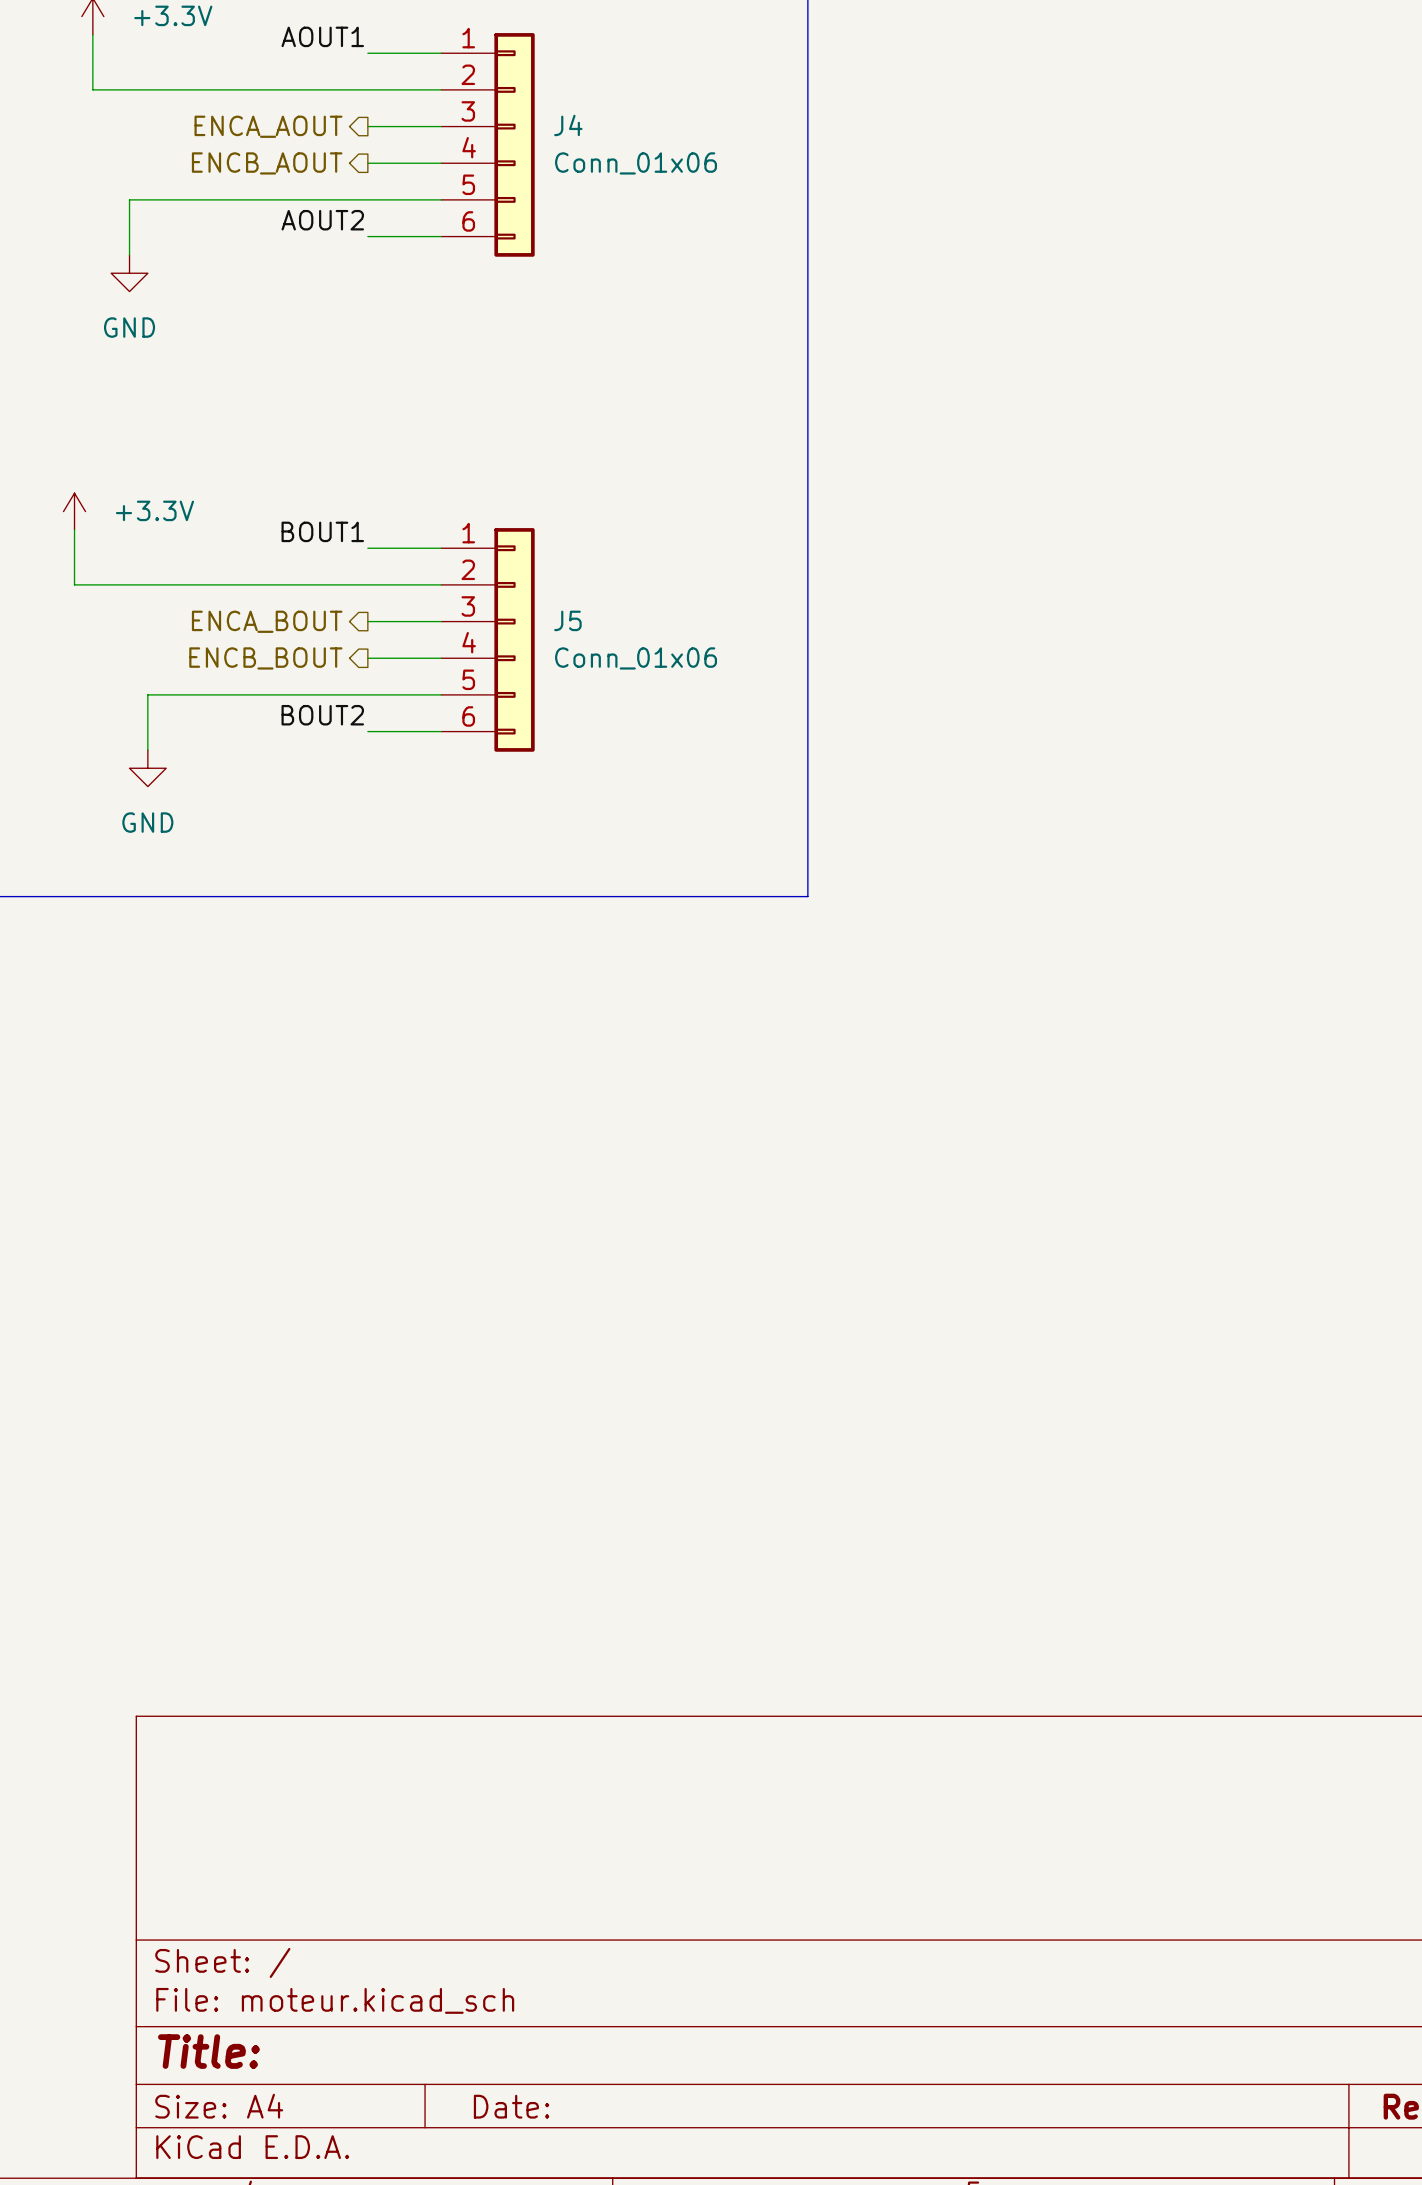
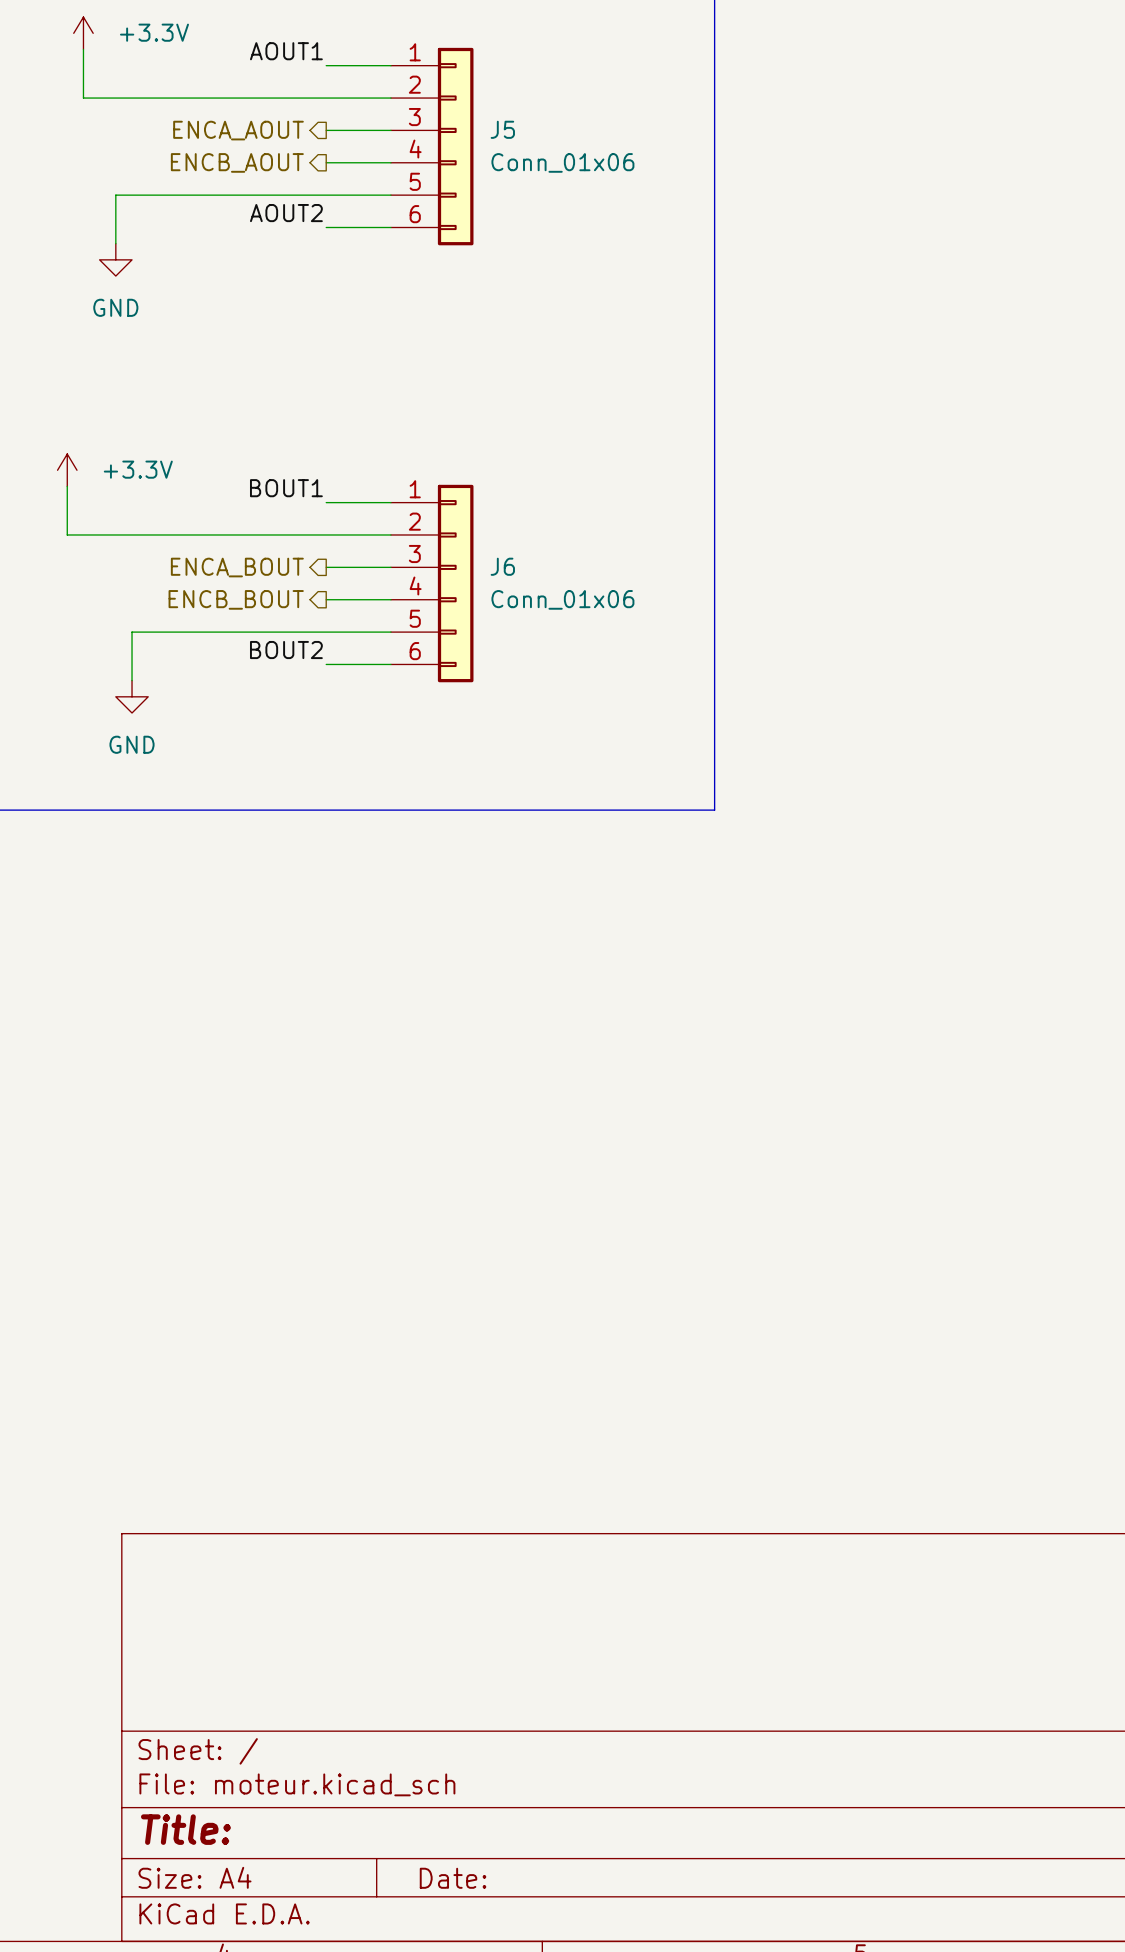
J4 name: J4 (568, 125) -> J5 (502, 129)
J5 name: J5 (567, 620) -> J6 (502, 566)

